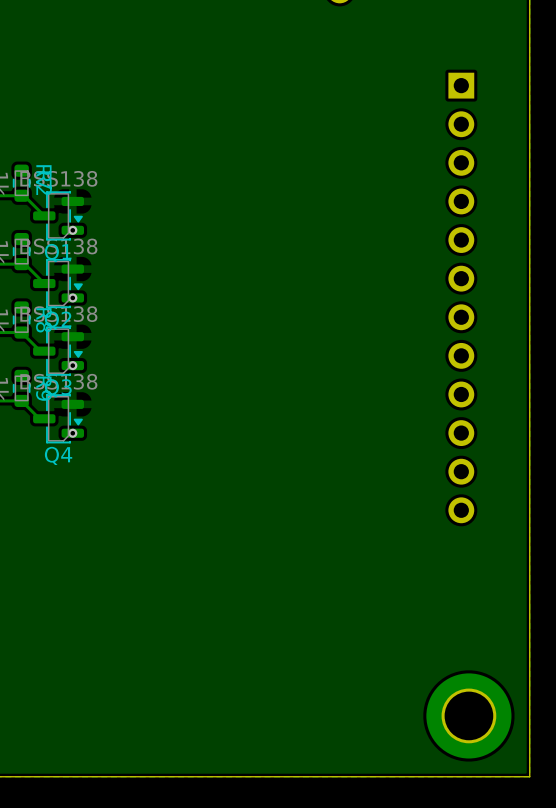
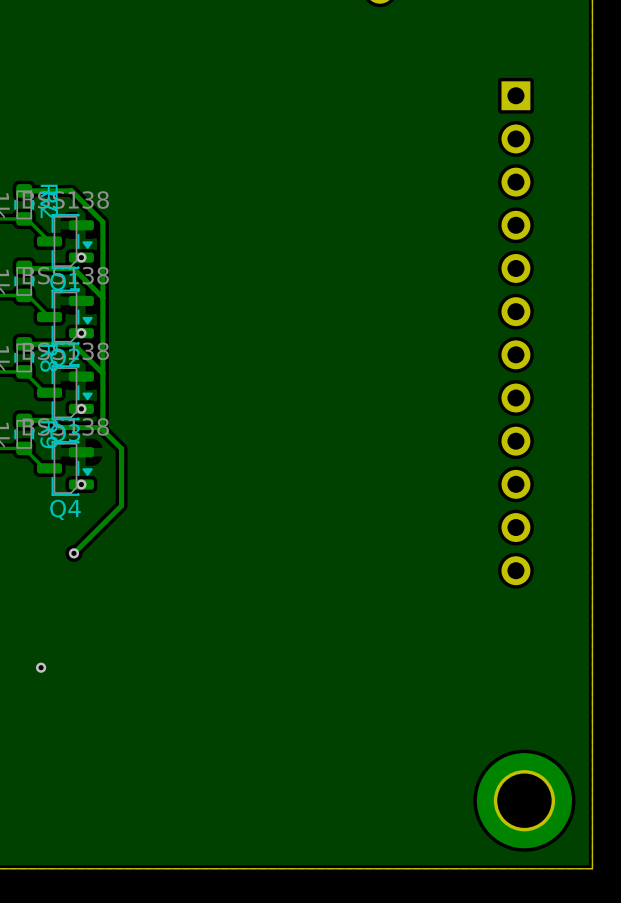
track: none -> (24, 190) (71, 190) (102, 222) (102, 430)
track: none -> (24, 267) (73, 268) (102, 297)
track: none -> (24, 343) (73, 344) (102, 373)
track: none -> (24, 420) (52, 420) (59, 427) (100, 427) (121, 448) (121, 505) (73, 553)
via: none -> (73, 553)
via: none -> (41, 667)

